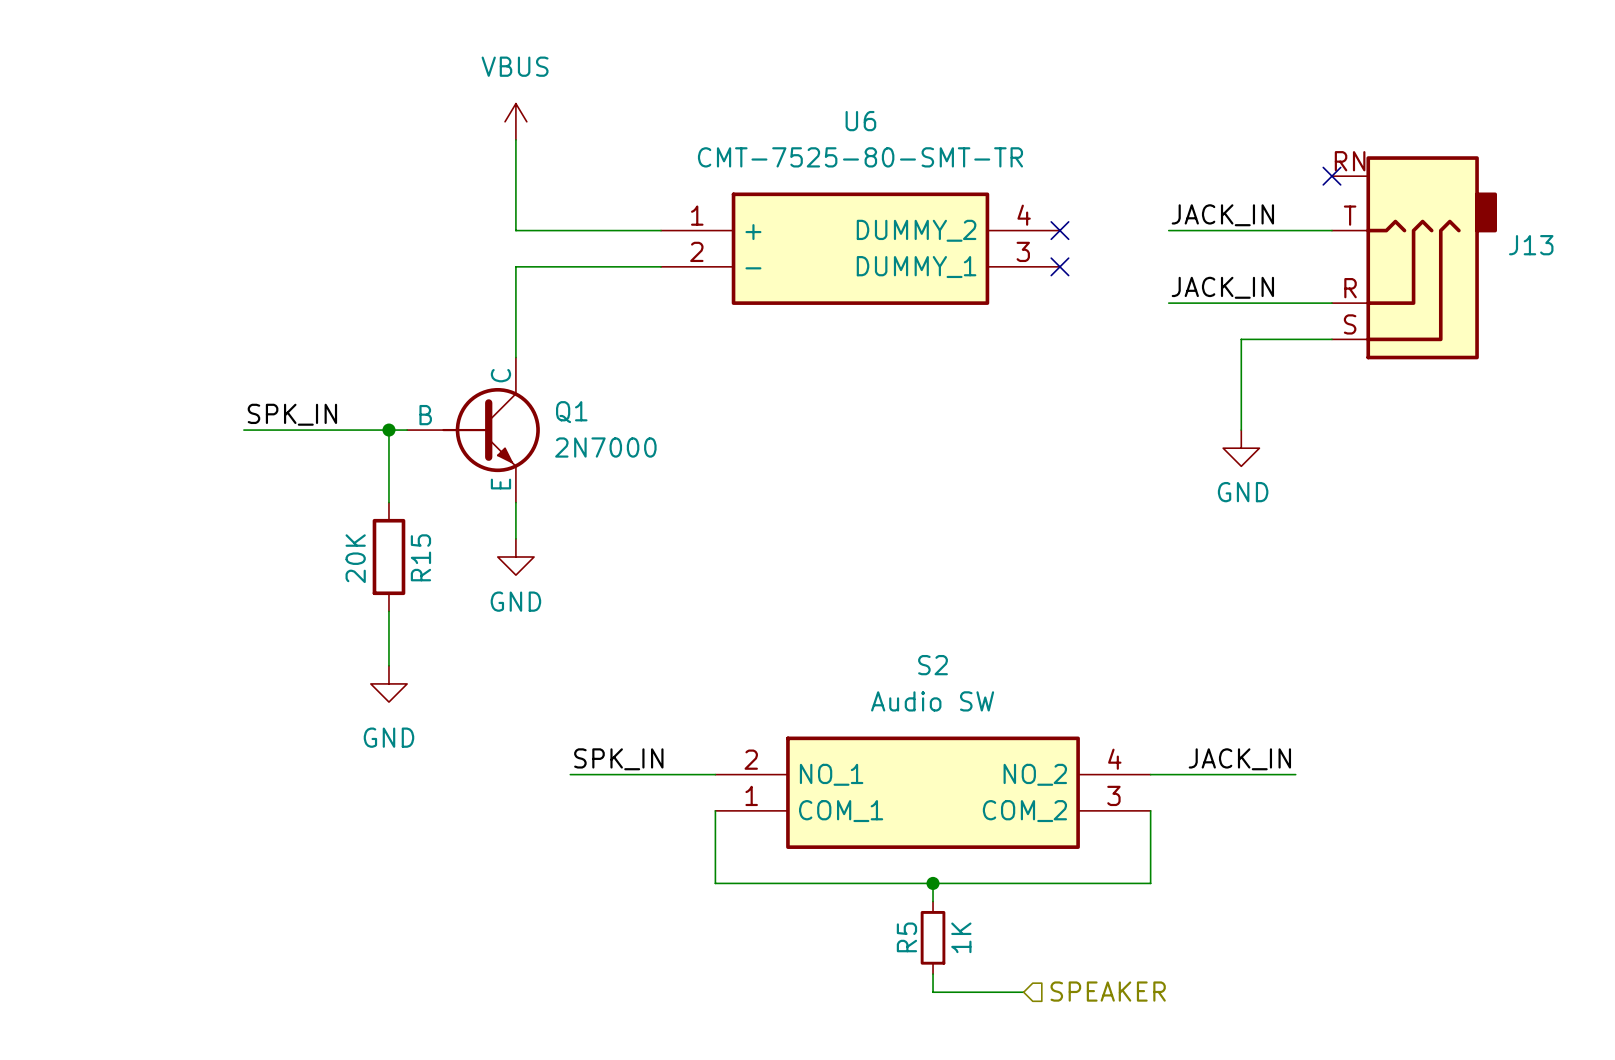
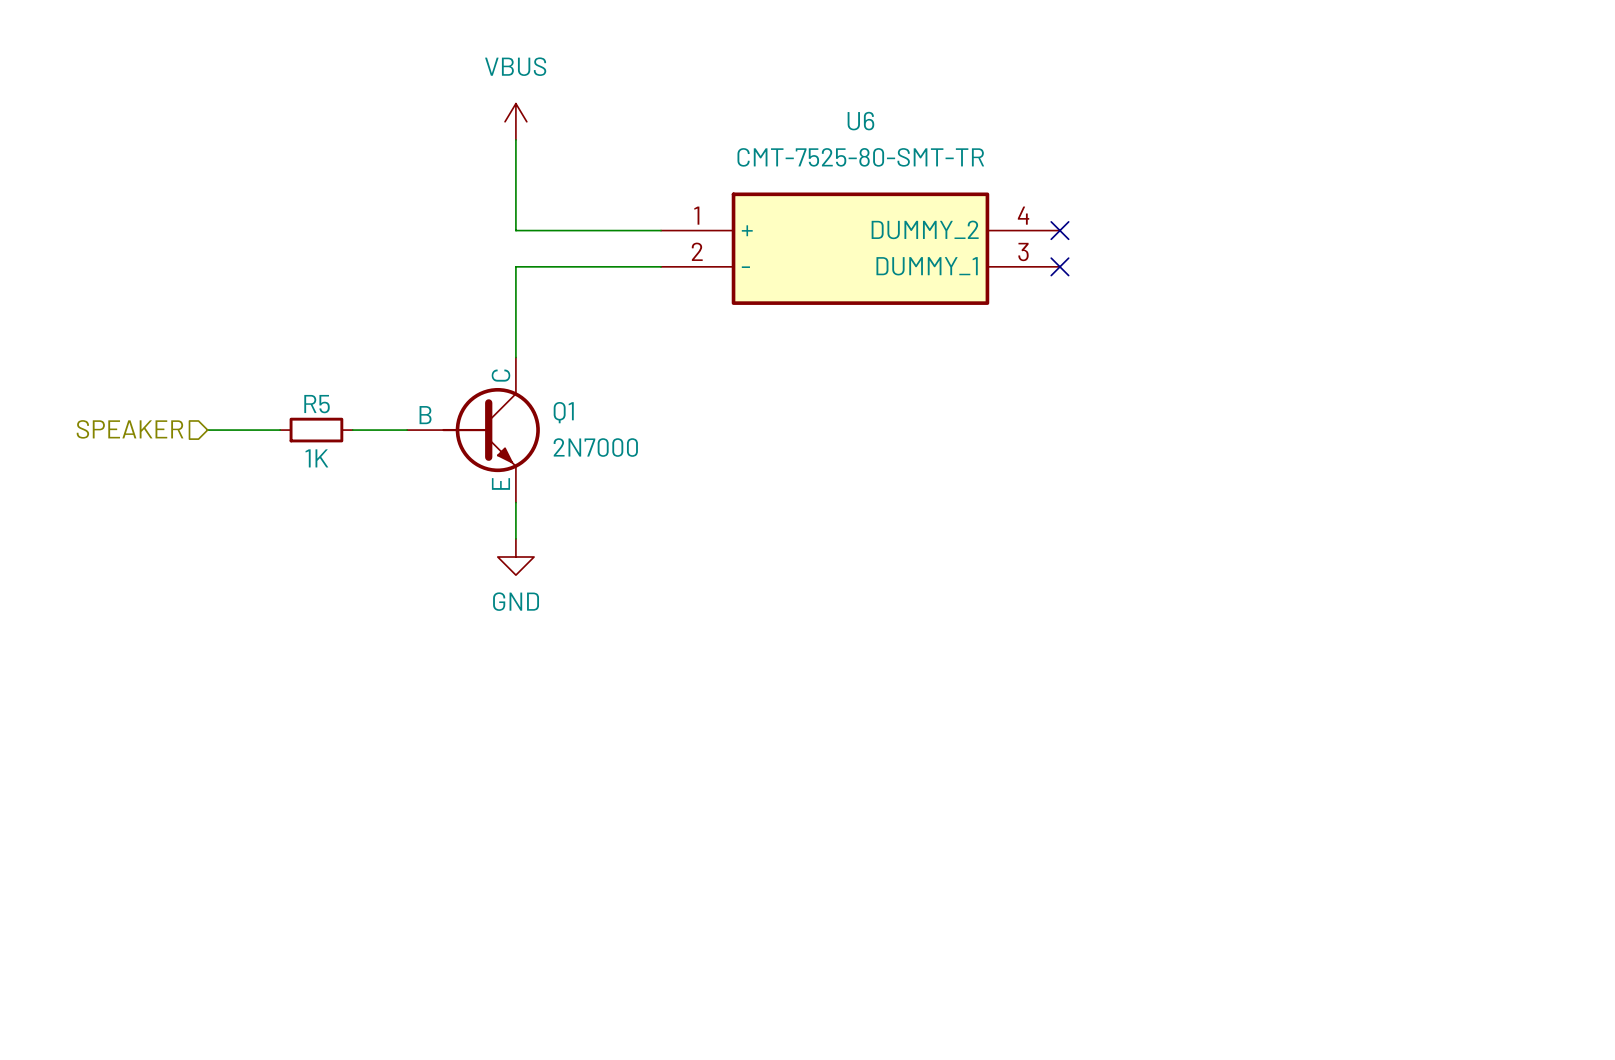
no-connect mark: (1331, 176) -> none
label: JACK_IN (1222, 215) -> none
wire: (1168, 230) (1331, 230) -> none
J13: (1414, 257) -> none
label: JACK_IN (1222, 287) -> none
wire: (1168, 303) (1331, 303) -> none
wire: (1331, 339) (1241, 339) (1241, 430) -> none
label: SPK_IN (292, 414) -> none
hierarchical label: none -> SPEAKER (130, 429)
wire: none -> (207, 430) (243, 430)
wire: (280, 430) (352, 430) -> none
wire: (388, 430) (388, 502) -> none
junction: (388, 430) -> none
power symbol: GND (1241, 448) -> none
R15: 20K (388, 557) -> none
wire: (388, 611) (388, 665) -> none
power symbol: GND (388, 683) -> none
label: SPK_IN (618, 759) -> none
label: JACK_IN (1239, 759) -> none
wire: (570, 774) (715, 774) -> none
wire: (1150, 774) (1295, 774) -> none
S2: Audio SW (933, 792) -> none
wire: (715, 810) (715, 883) (1150, 883) (1150, 810) -> none
wire: (933, 883) (933, 901) -> none
junction: (933, 883) -> none
R5 rotation: 0° (933, 937) -> 90° clockwise (316, 430)
R5 position: (933, 937) -> (316, 430)
wire: (933, 974) (933, 992) (1023, 992) -> none
hierarchical label: SPEAKER (1108, 991) -> none

